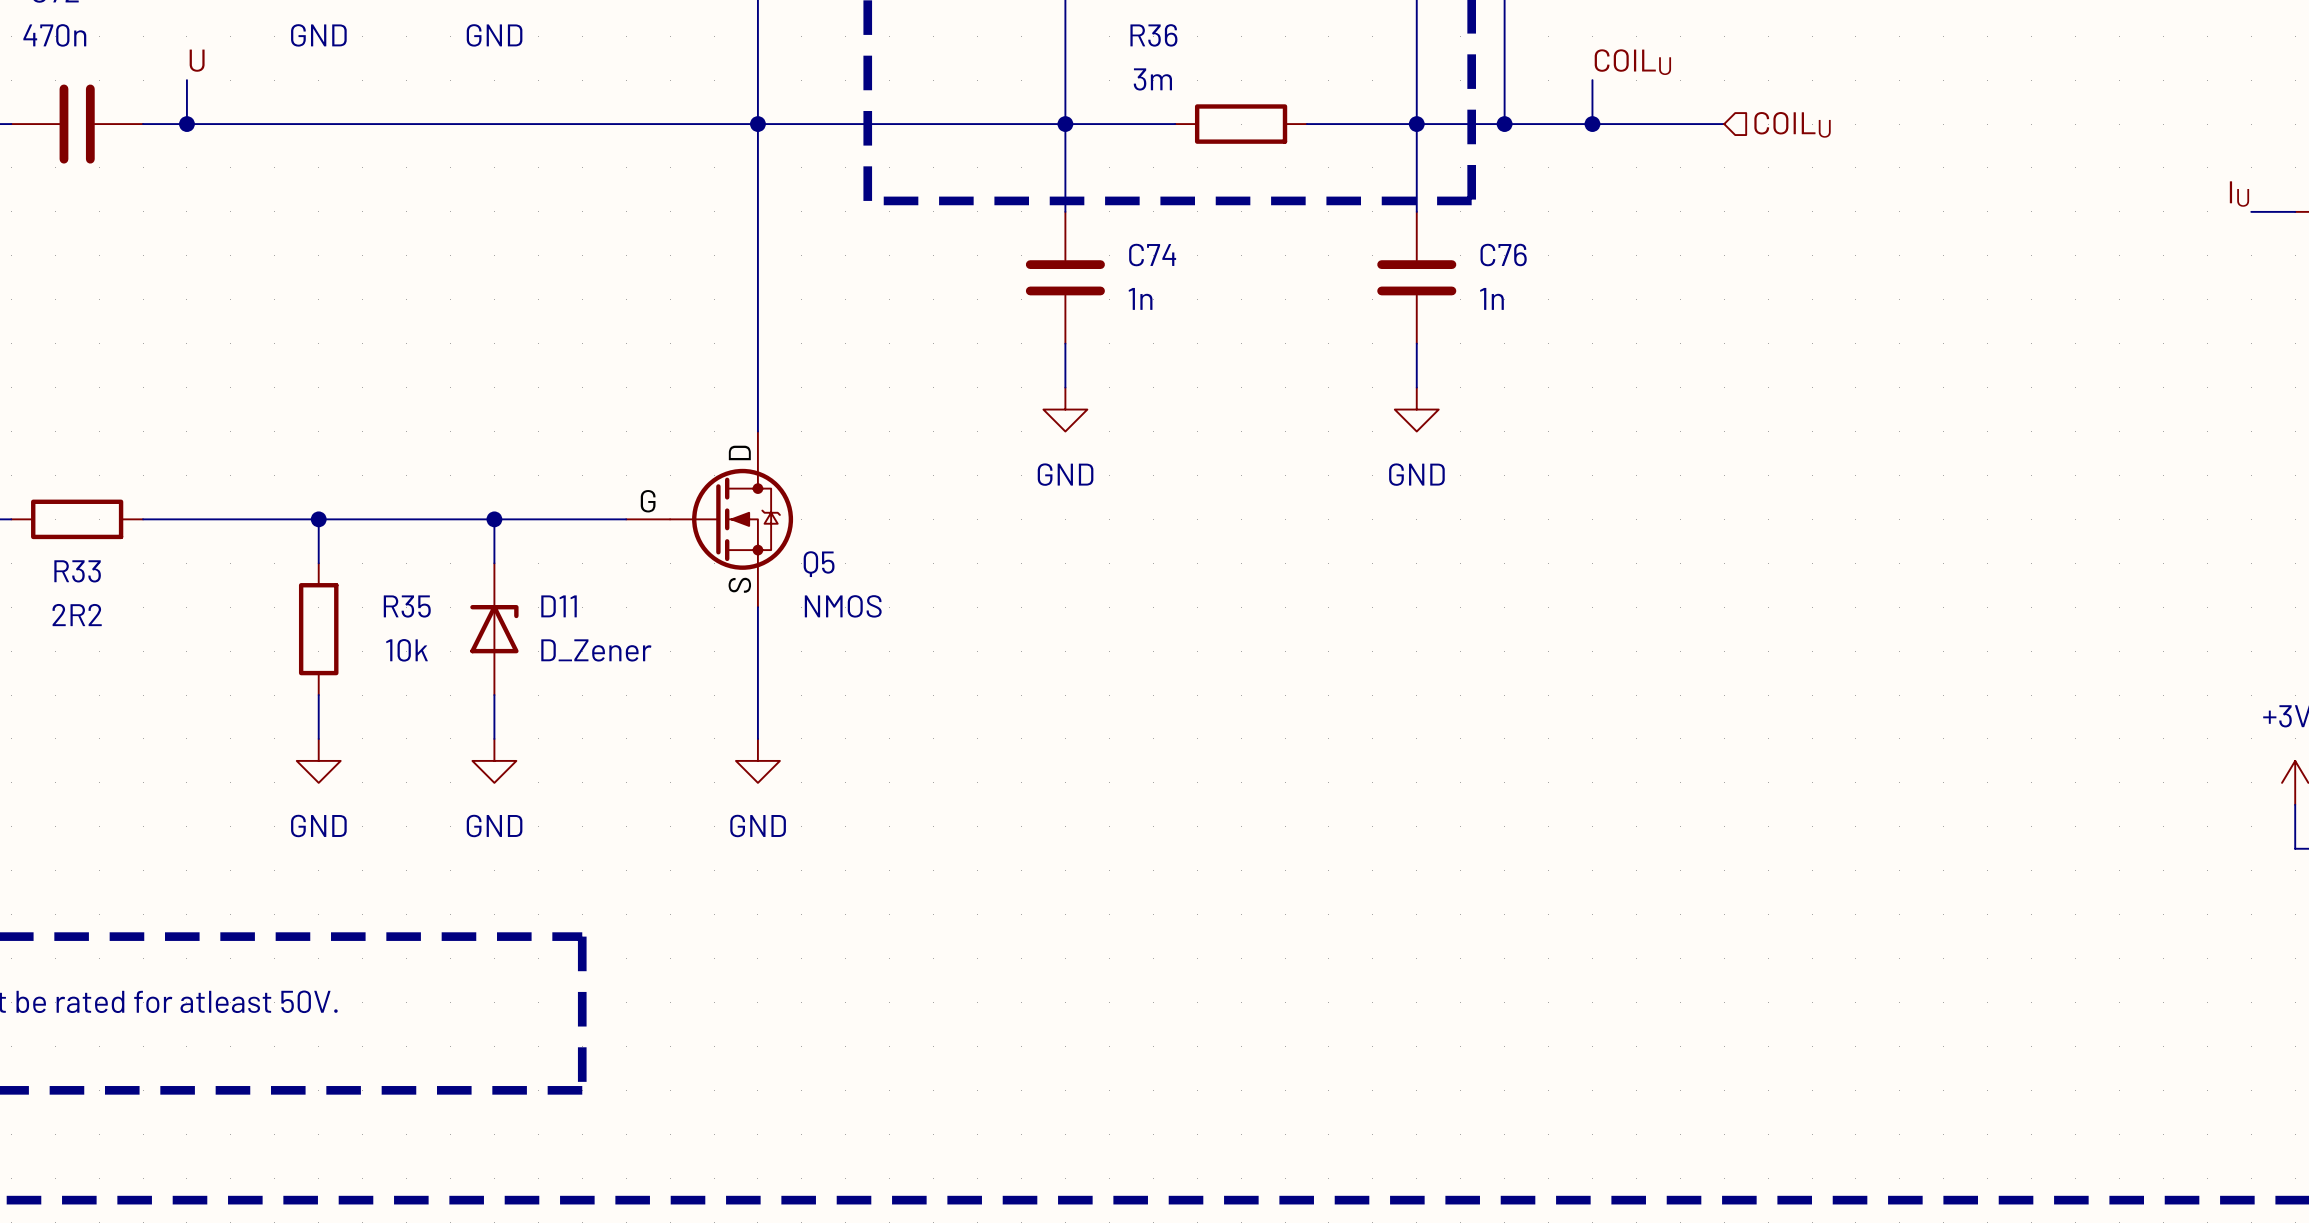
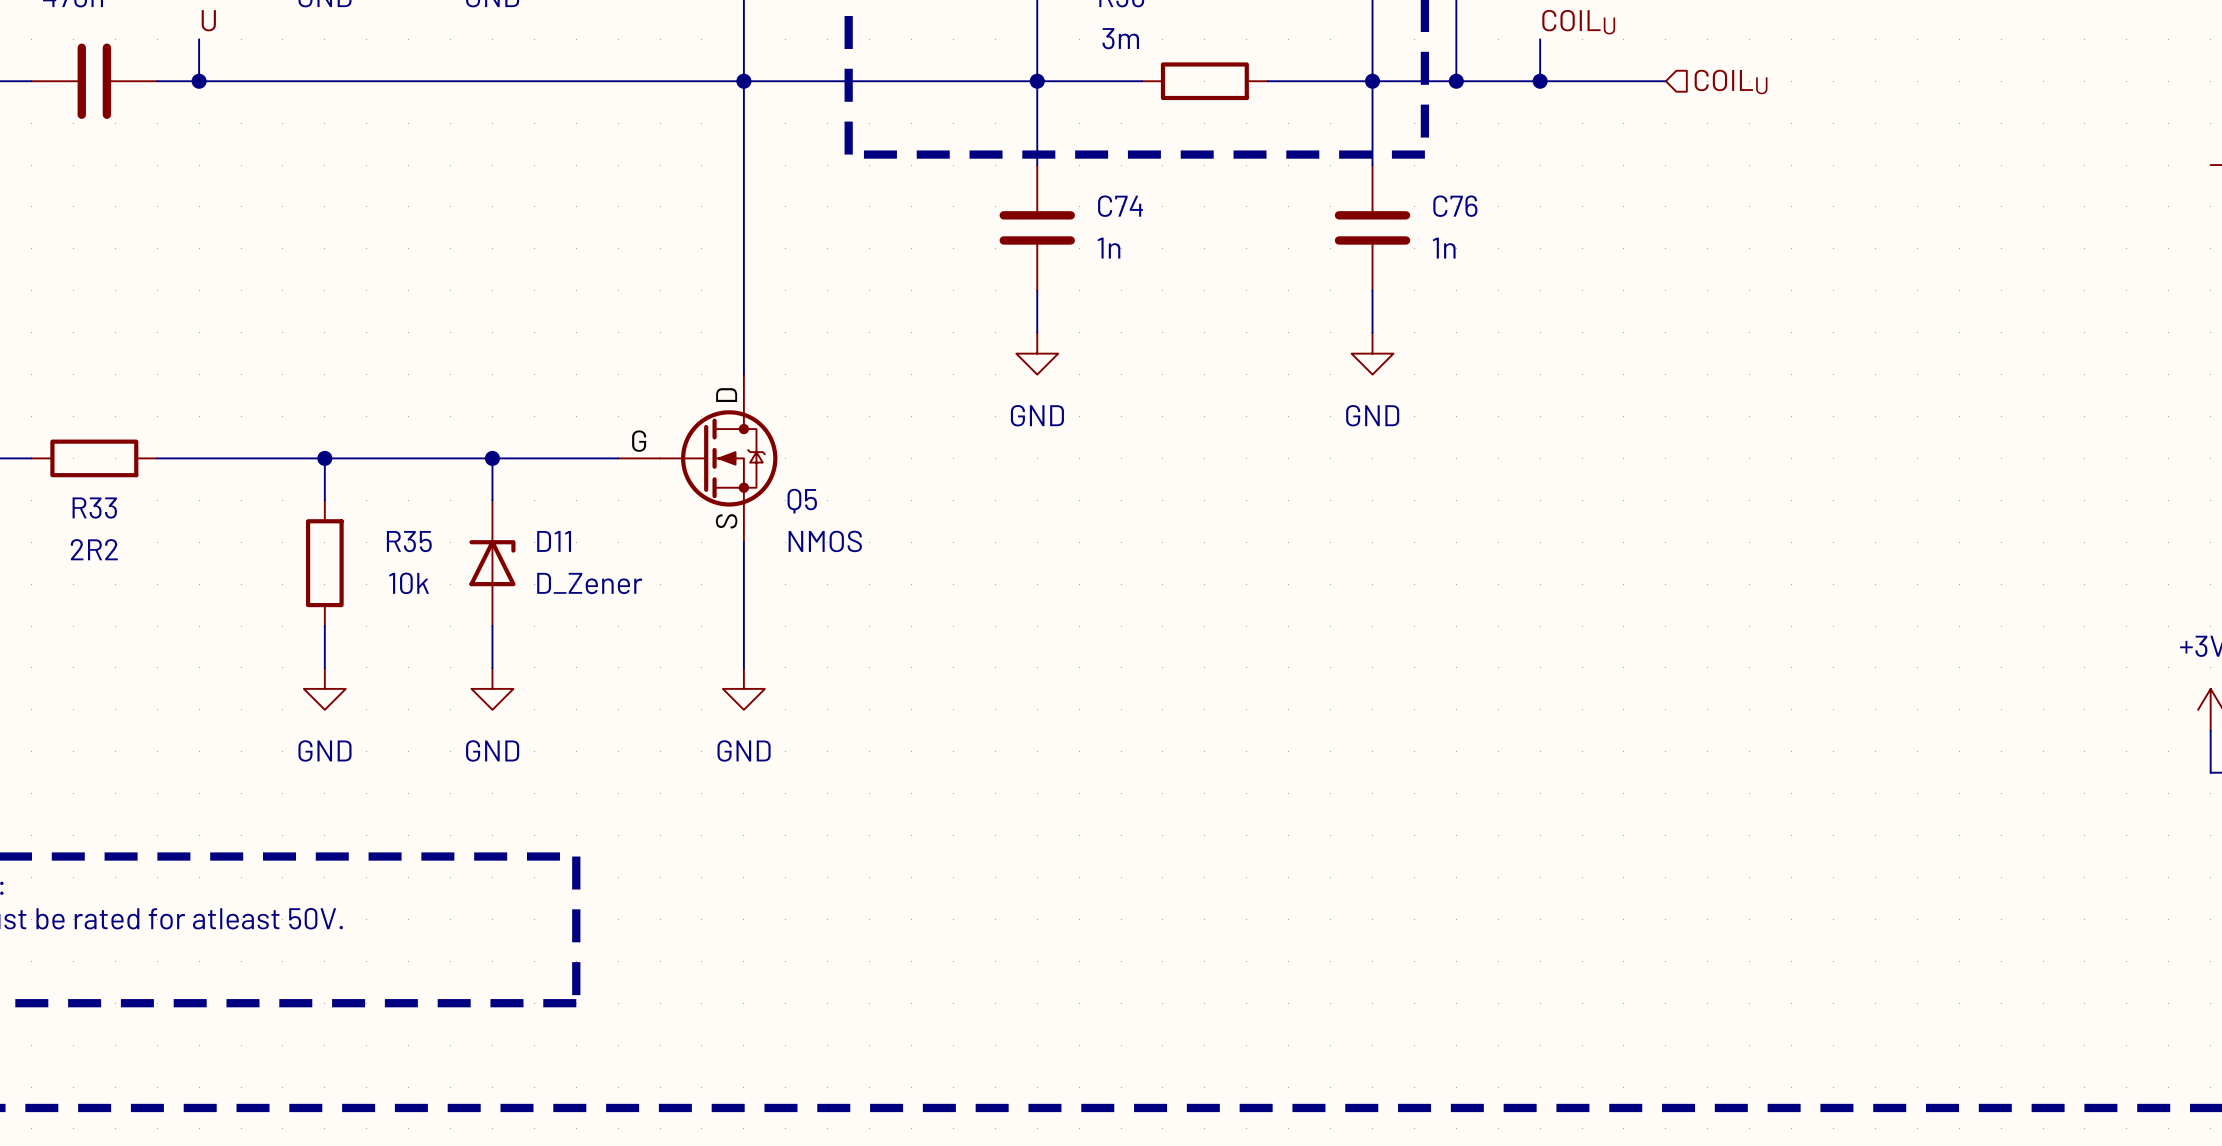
label: IU (2239, 194) -> none
wire: (2251, 211) (2295, 211) -> none

